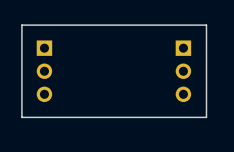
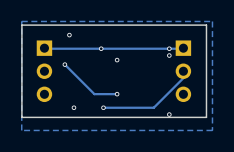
zone outline: none -> (212, 21) (21, 21) (21, 130) (212, 130) (212, 21)
via: none -> (69, 35)
via: none -> (101, 48)
via: none -> (169, 48)
track: none -> (189, 48) (44, 48)
via: none -> (169, 55)
via: none -> (117, 60)
track: none -> (64, 64) (94, 94) (117, 94)
via: none -> (64, 64)
track: none -> (189, 71) (153, 107) (103, 107)
via: none -> (117, 94)
via: none -> (73, 107)
via: none -> (103, 107)
via: none -> (169, 114)

